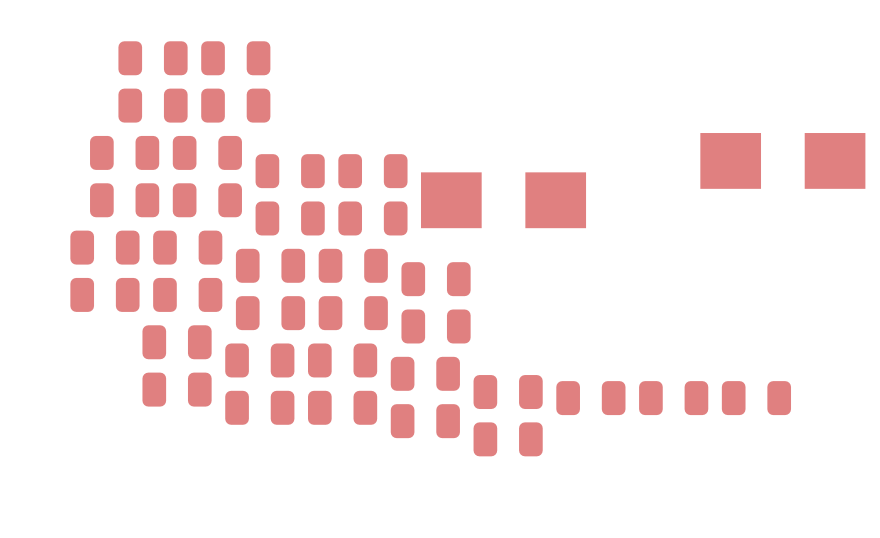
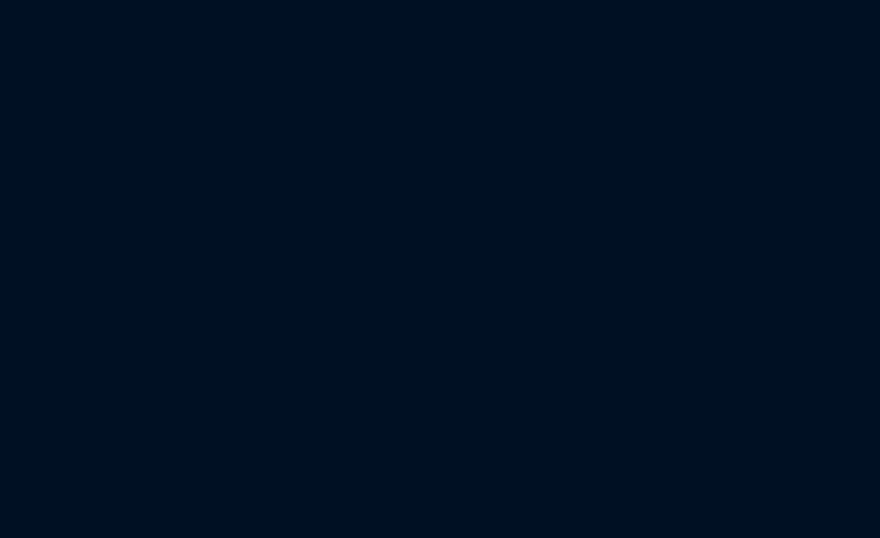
part: (153, 58) -> none
part: (235, 58) -> none
part: (153, 105) -> none
part: (235, 105) -> none
part: (124, 152) -> none
part: (207, 152) -> none
part: (782, 160) -> none
part: (290, 171) -> none
part: (372, 171) -> none
part: (124, 200) -> none
part: (207, 200) -> none
part: (503, 200) -> none
part: (290, 218) -> none
part: (372, 218) -> none
part: (104, 247) -> none
part: (187, 247) -> none
part: (270, 265) -> none
part: (353, 265) -> none
part: (436, 279) -> none
part: (104, 294) -> none
part: (187, 294) -> none
part: (270, 313) -> none
part: (353, 313) -> none
part: (436, 326) -> none
part: (177, 342) -> none
part: (259, 360) -> none
part: (342, 360) -> none
part: (425, 373) -> none
part: (177, 389) -> none
part: (508, 392) -> none
part: (590, 398) -> none
part: (673, 398) -> none
part: (756, 398) -> none
part: (259, 407) -> none
part: (342, 407) -> none
part: (425, 421) -> none
part: (508, 439) -> none

